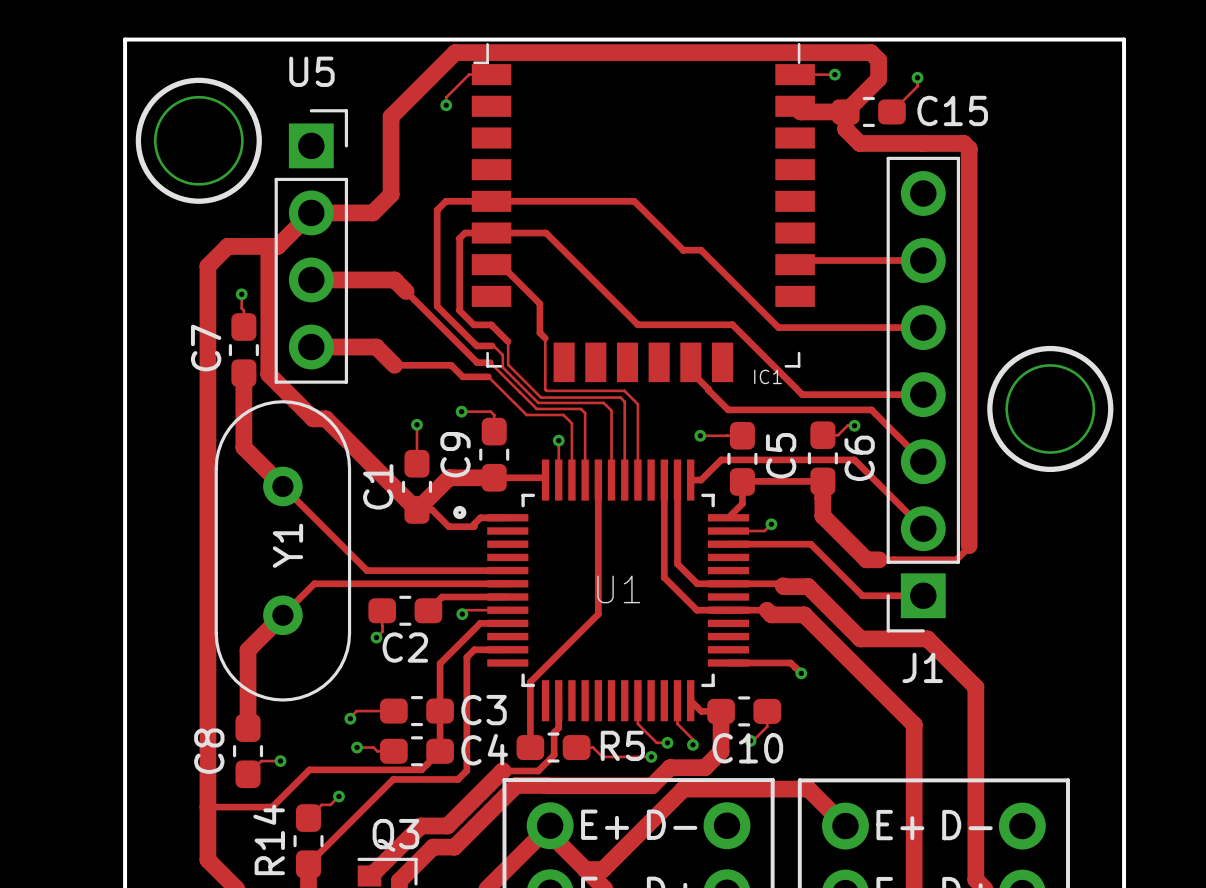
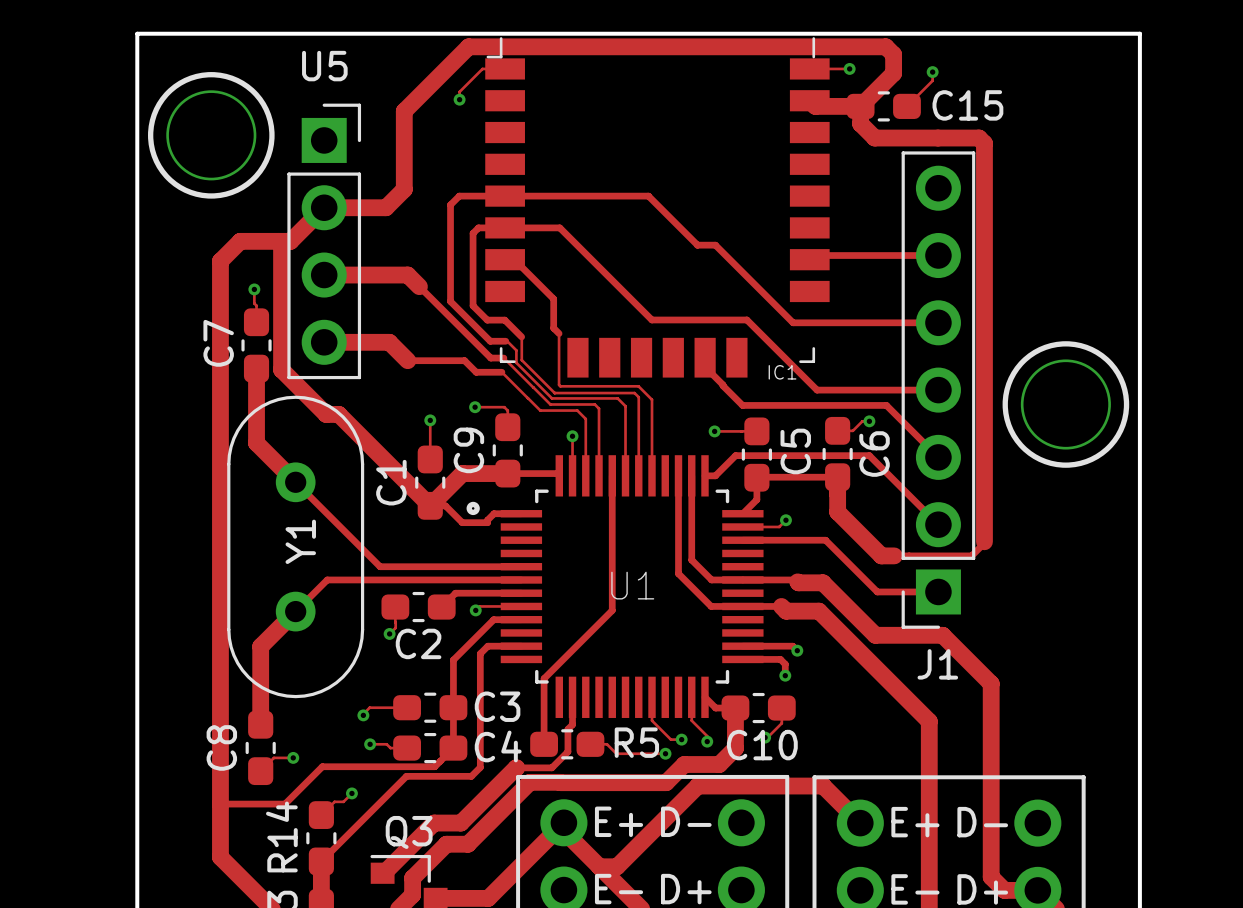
track: none -> (742, 646) (792, 646) (797, 650)
via: none -> (797, 650)
track: (765, 662) (790, 662) (801, 673) -> (780, 659) (785, 664) (785, 675)
via: (801, 673) -> none
via: none -> (785, 675)

